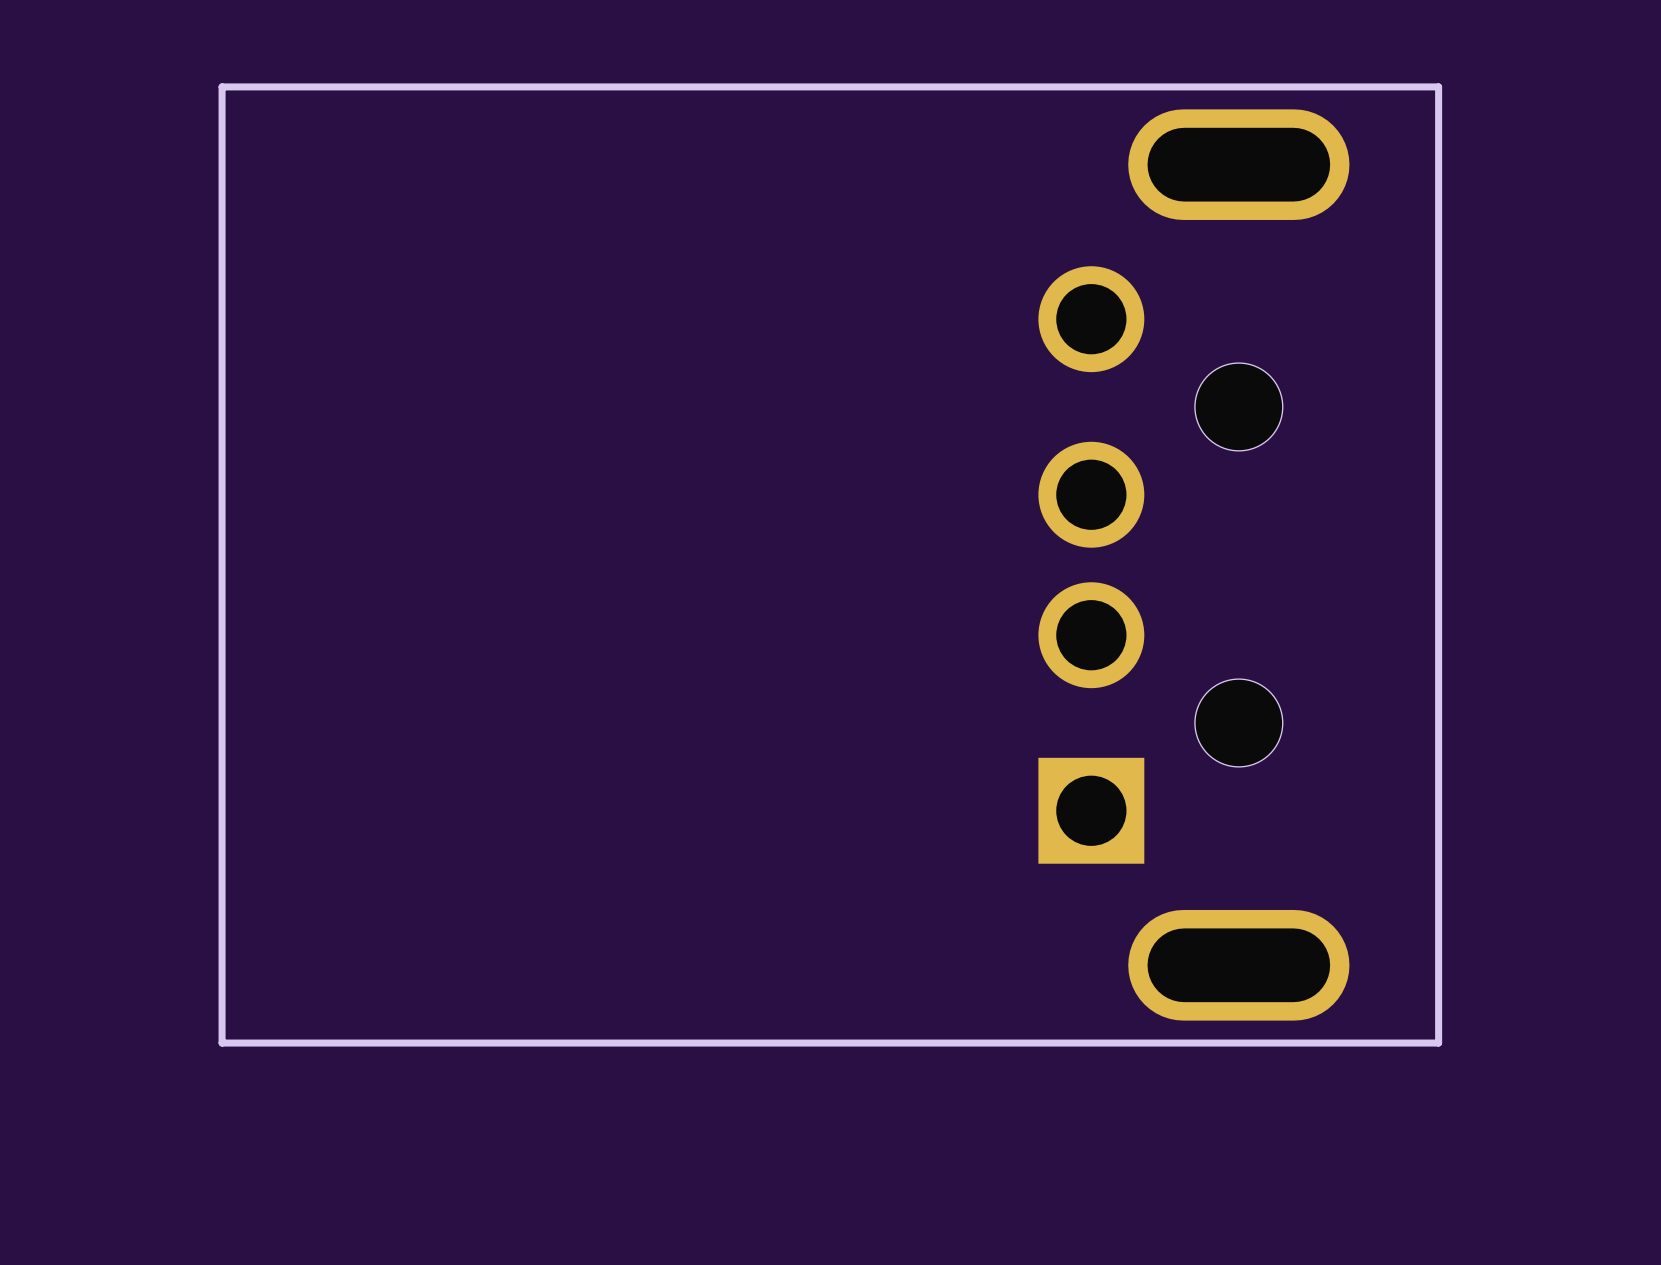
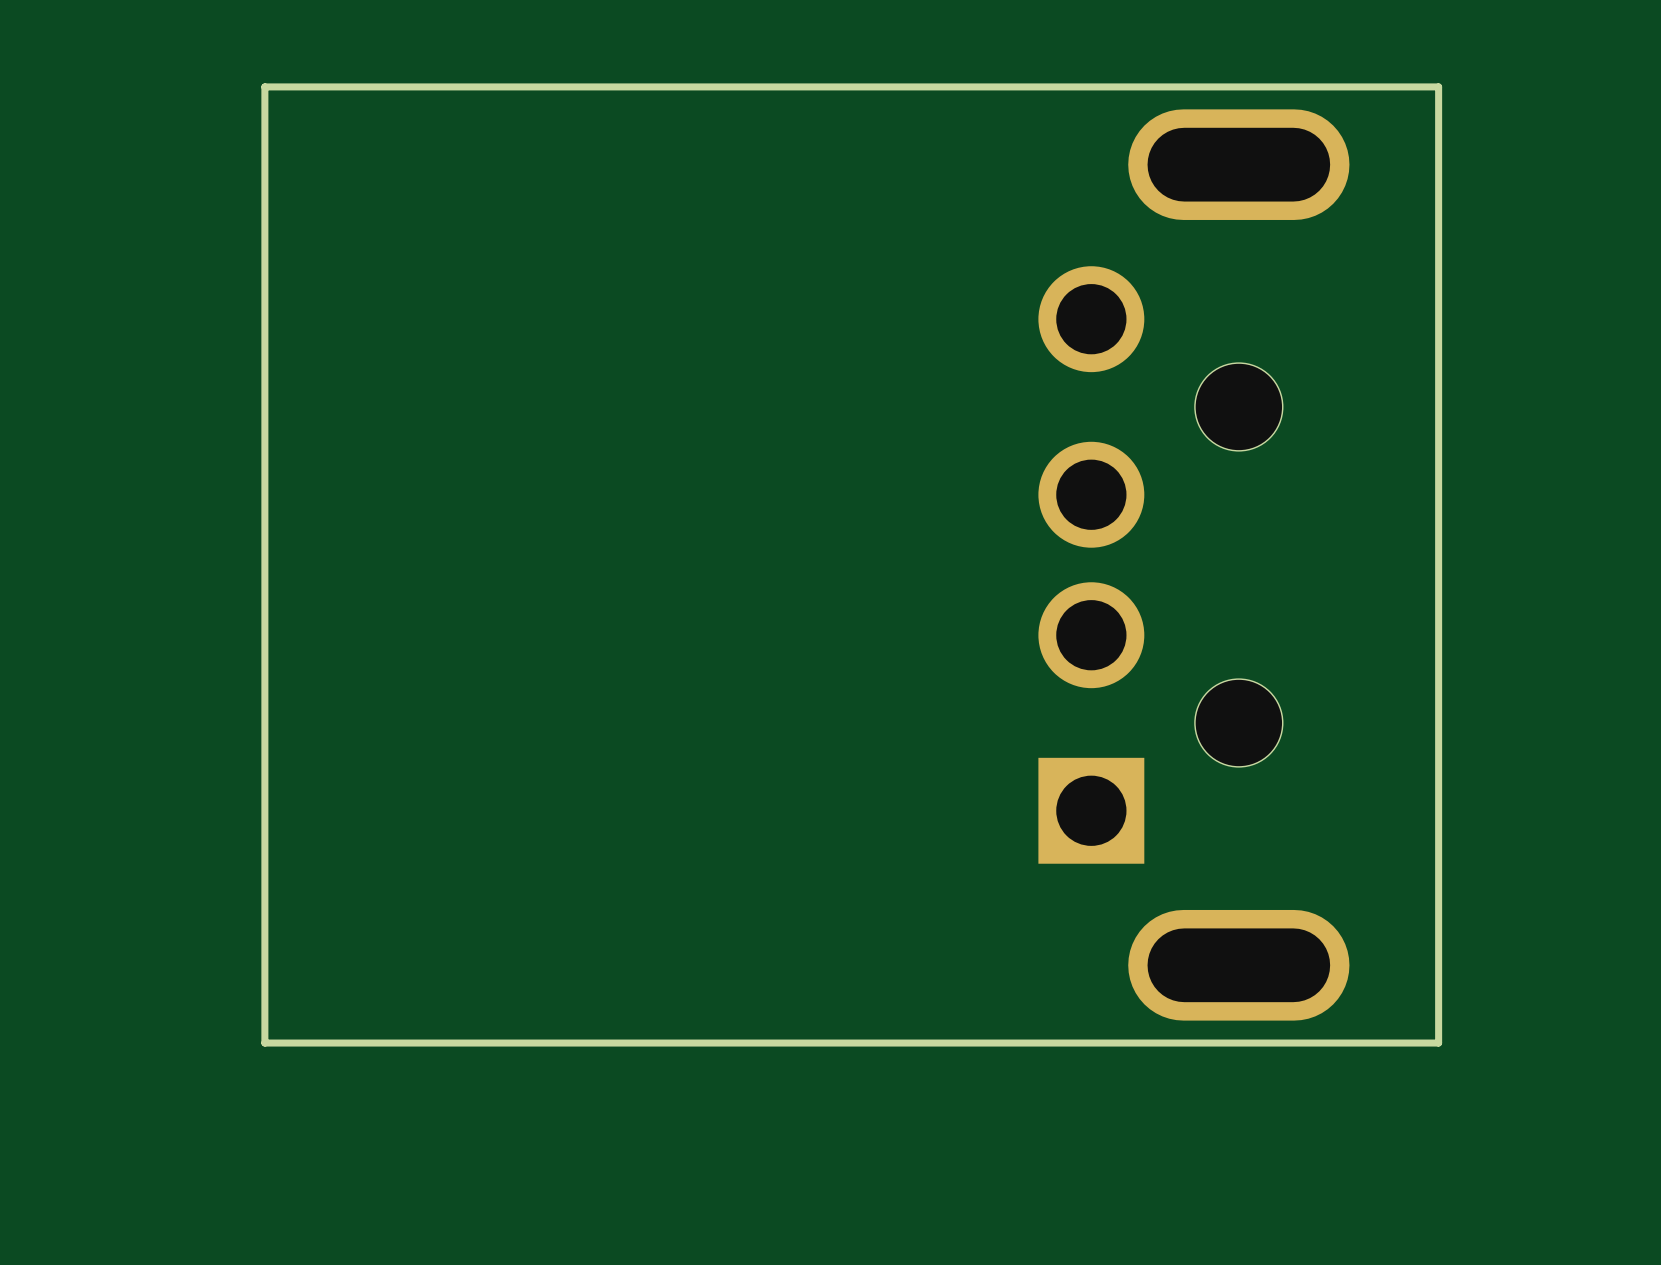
board edge: (264, 86) (222, 86) (222, 1043) (264, 1043) -> (264, 86) (264, 1043)

